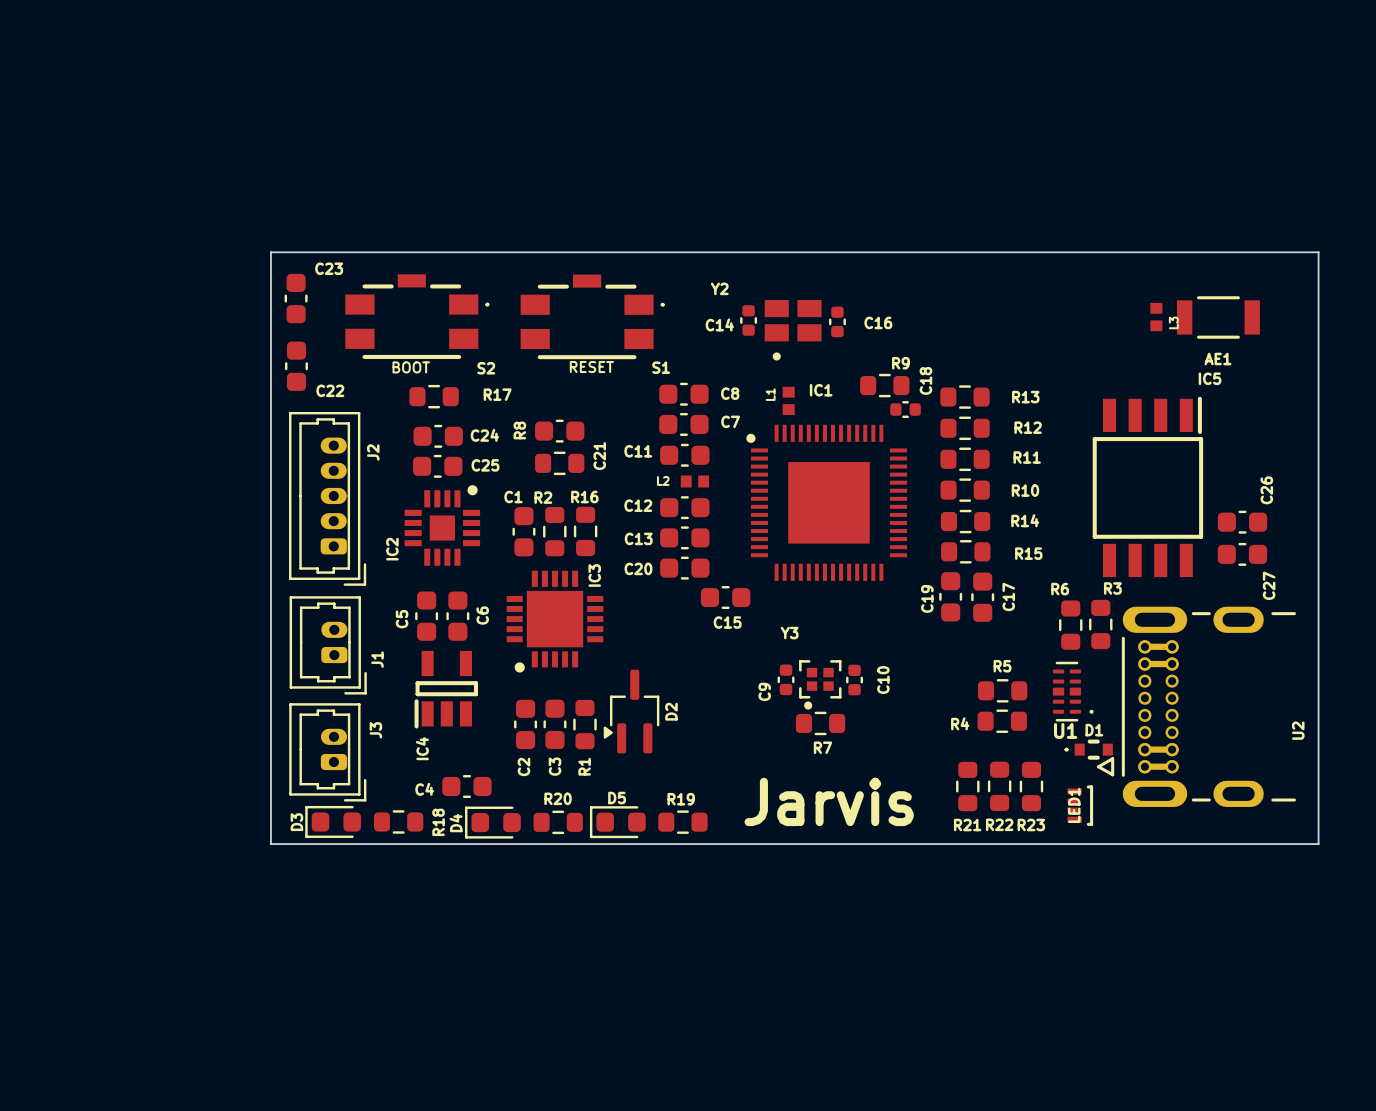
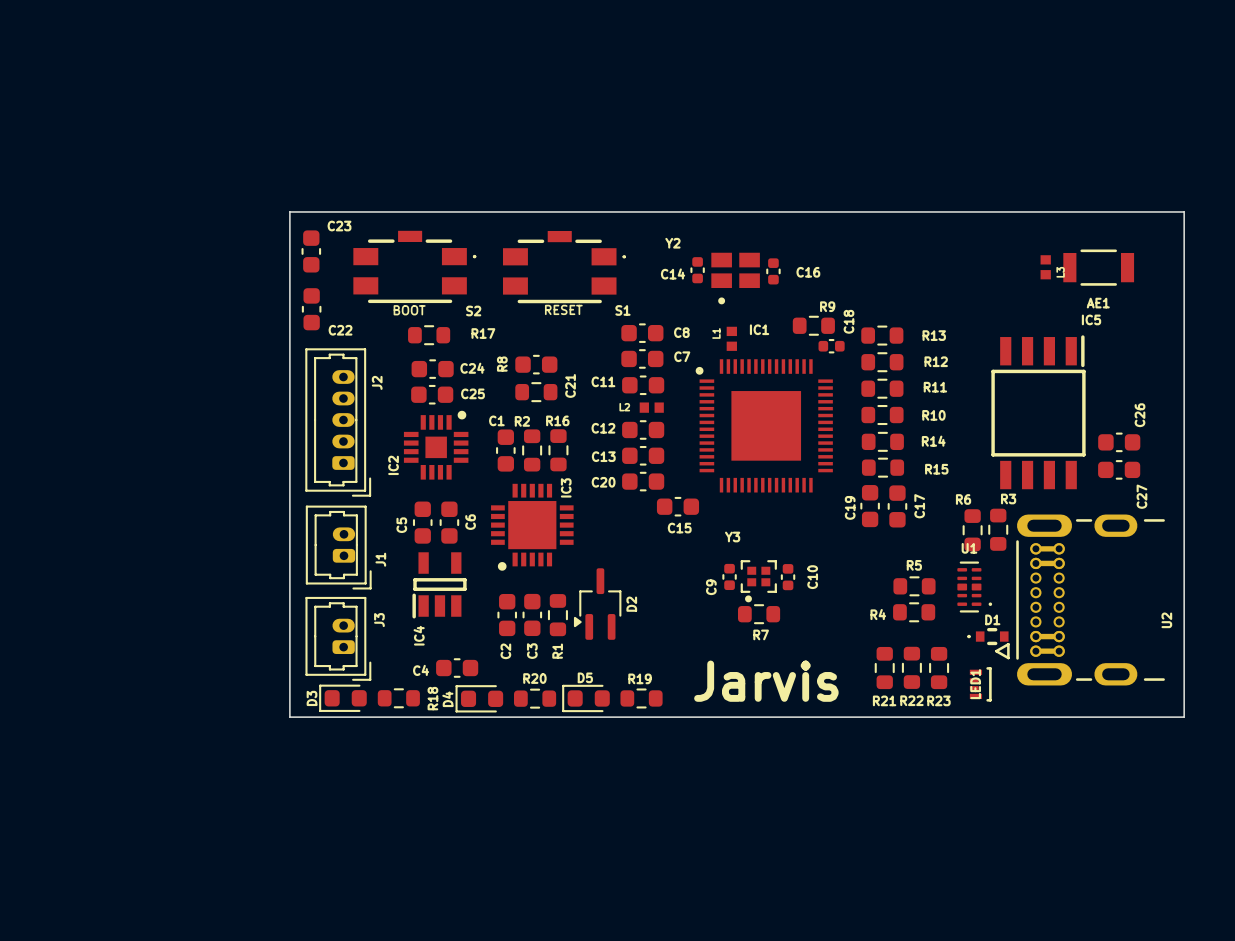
U1 name position: U1 (1065, 730) -> U1 (969, 548)

